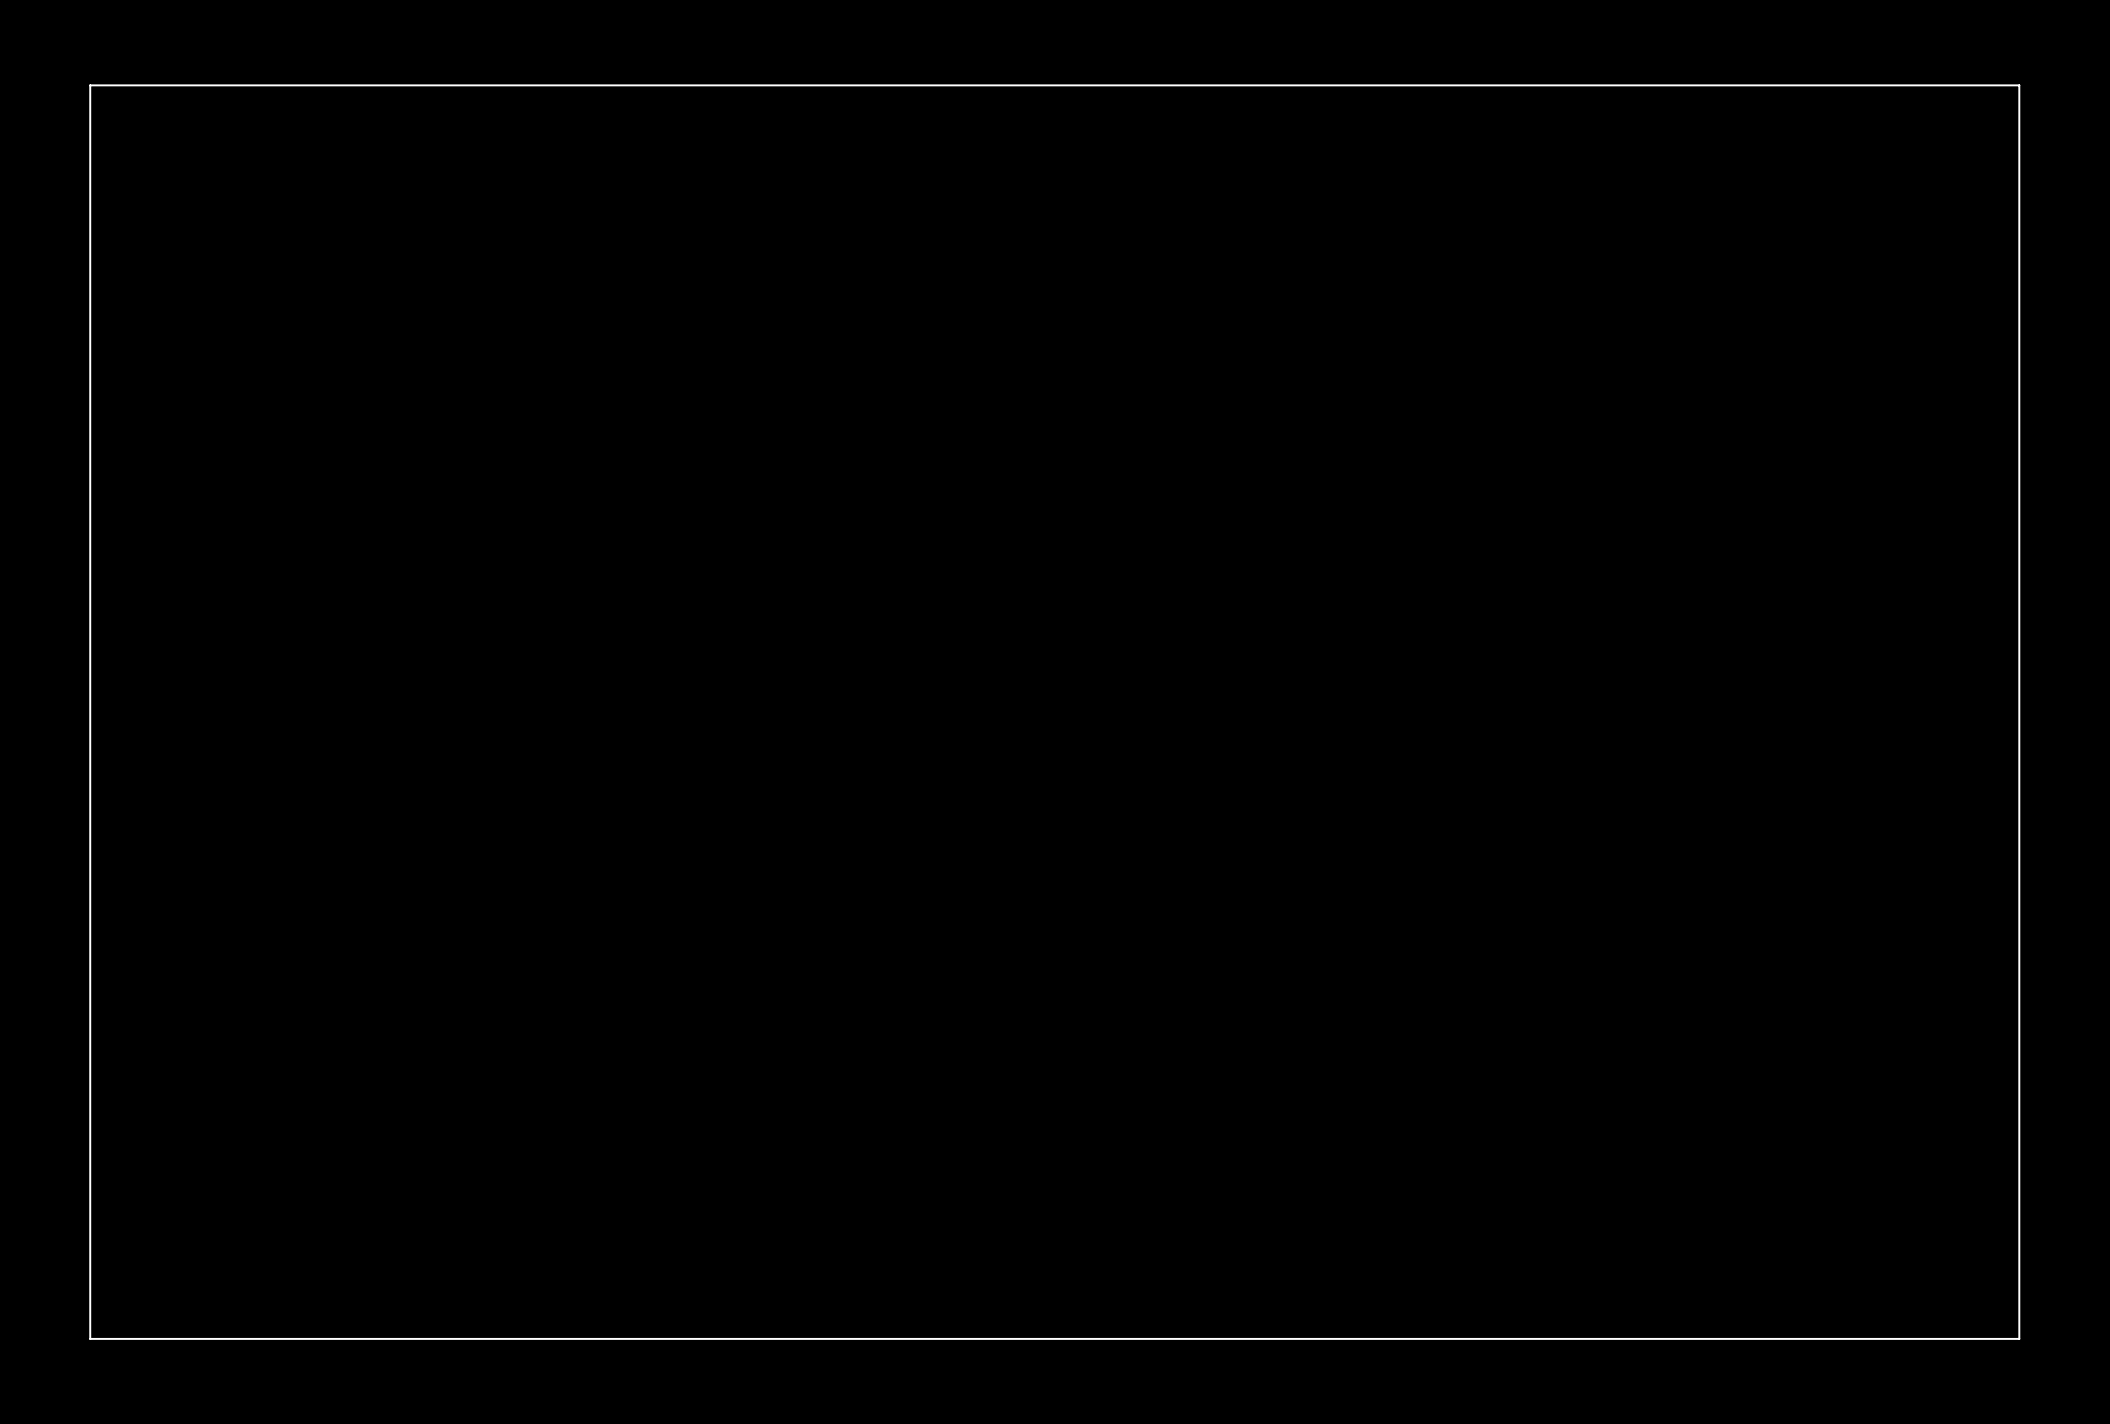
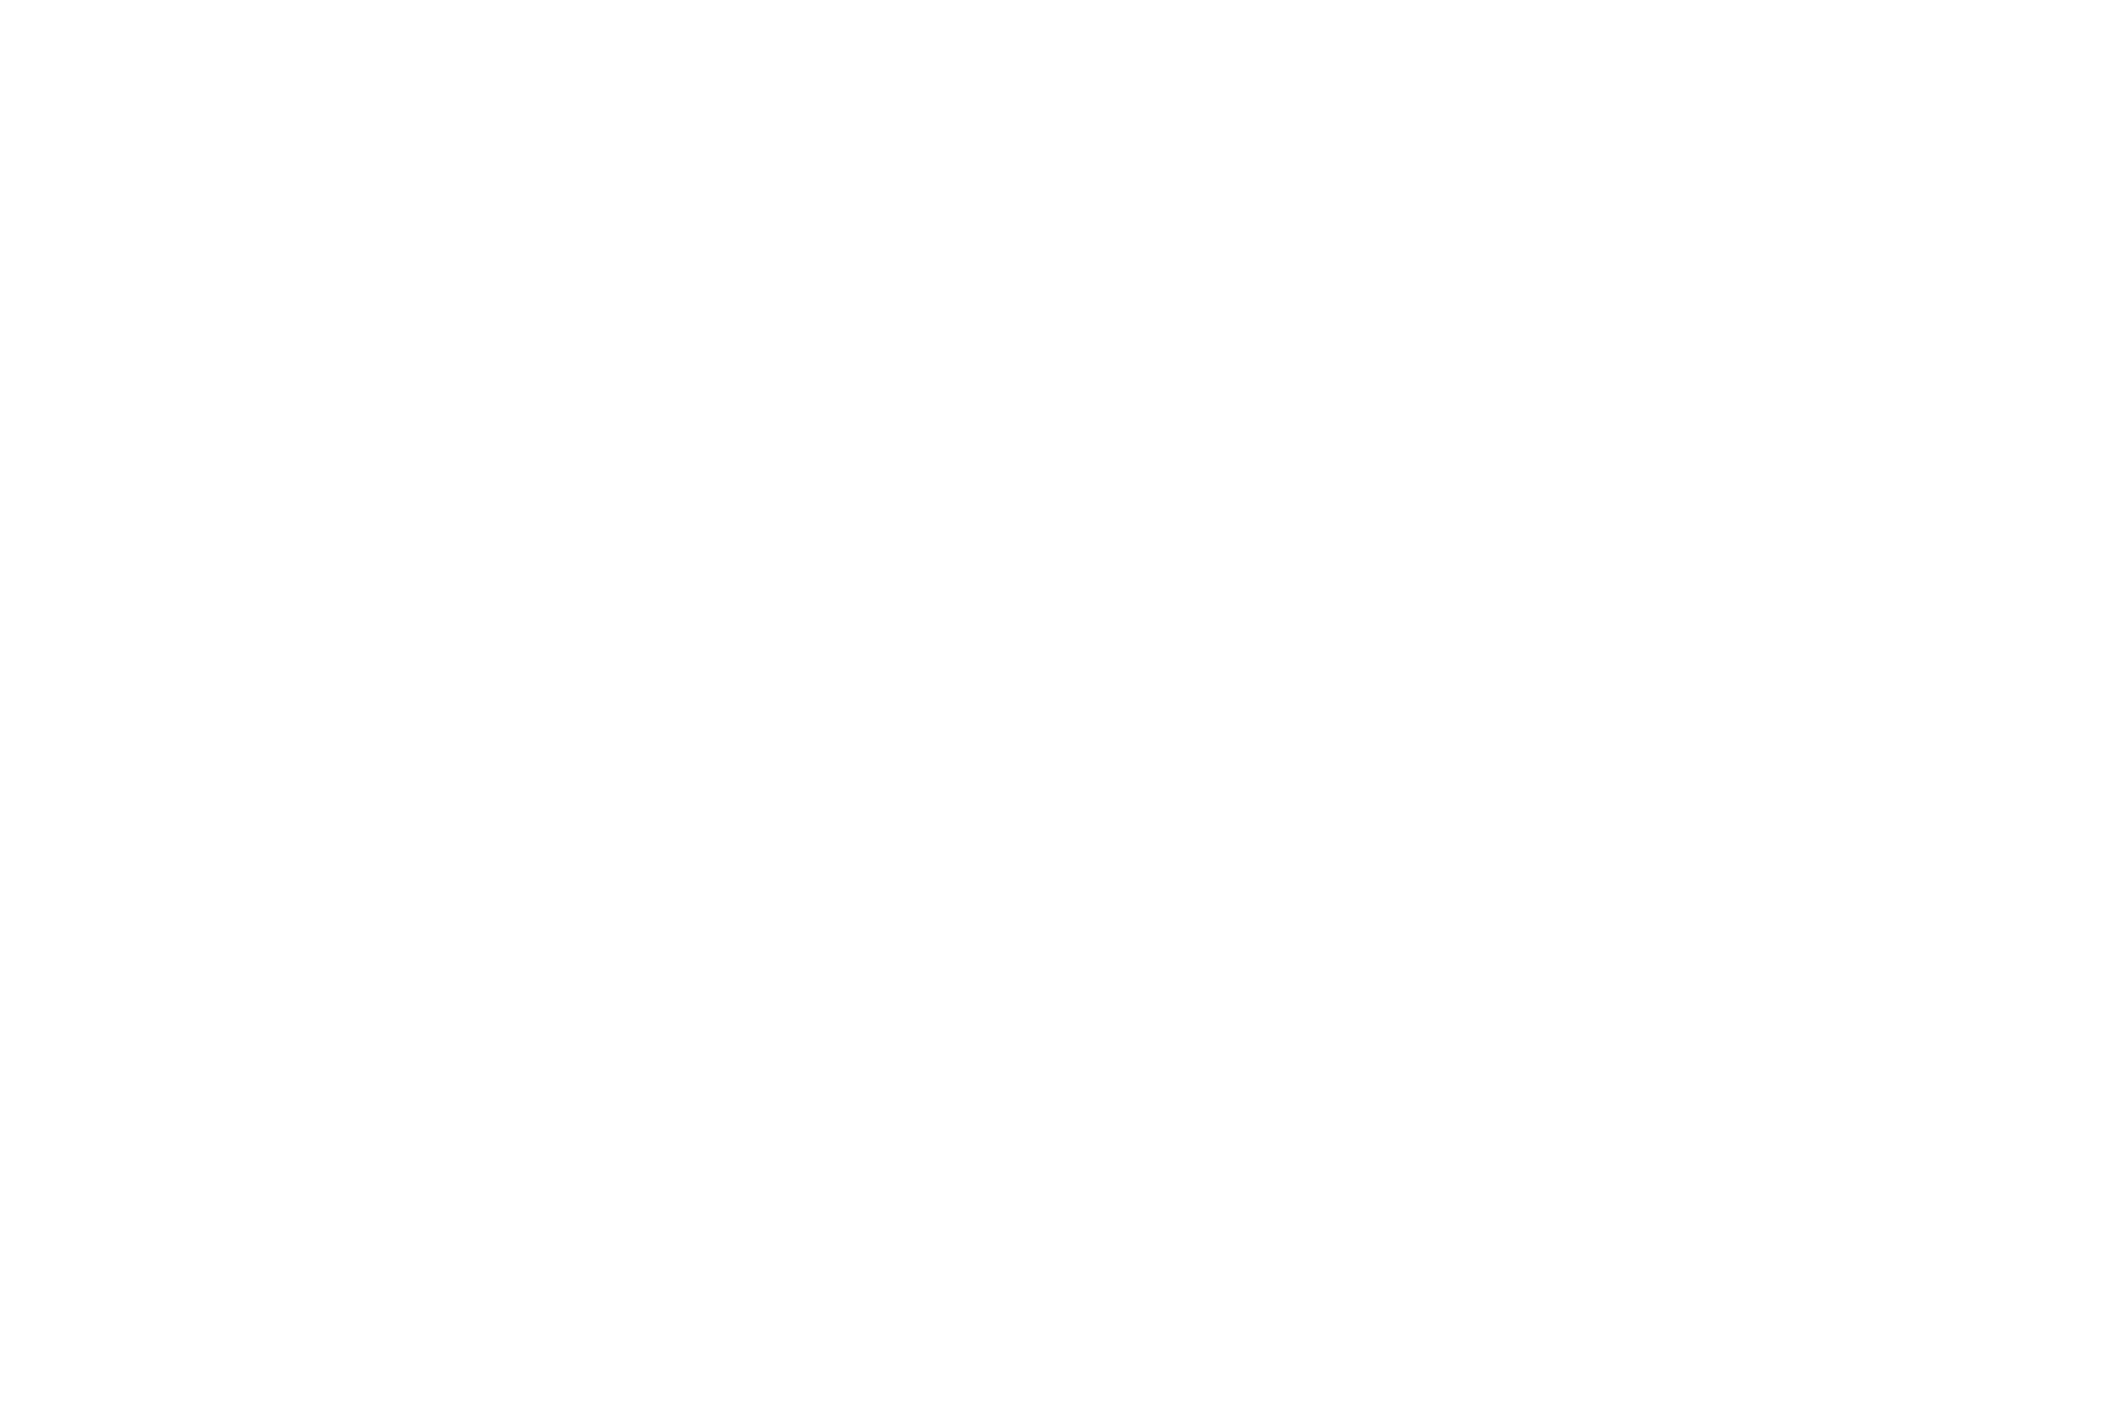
board edge: (90, 85) (2019, 85) (2019, 1338) (90, 1338) (90, 85) -> none

